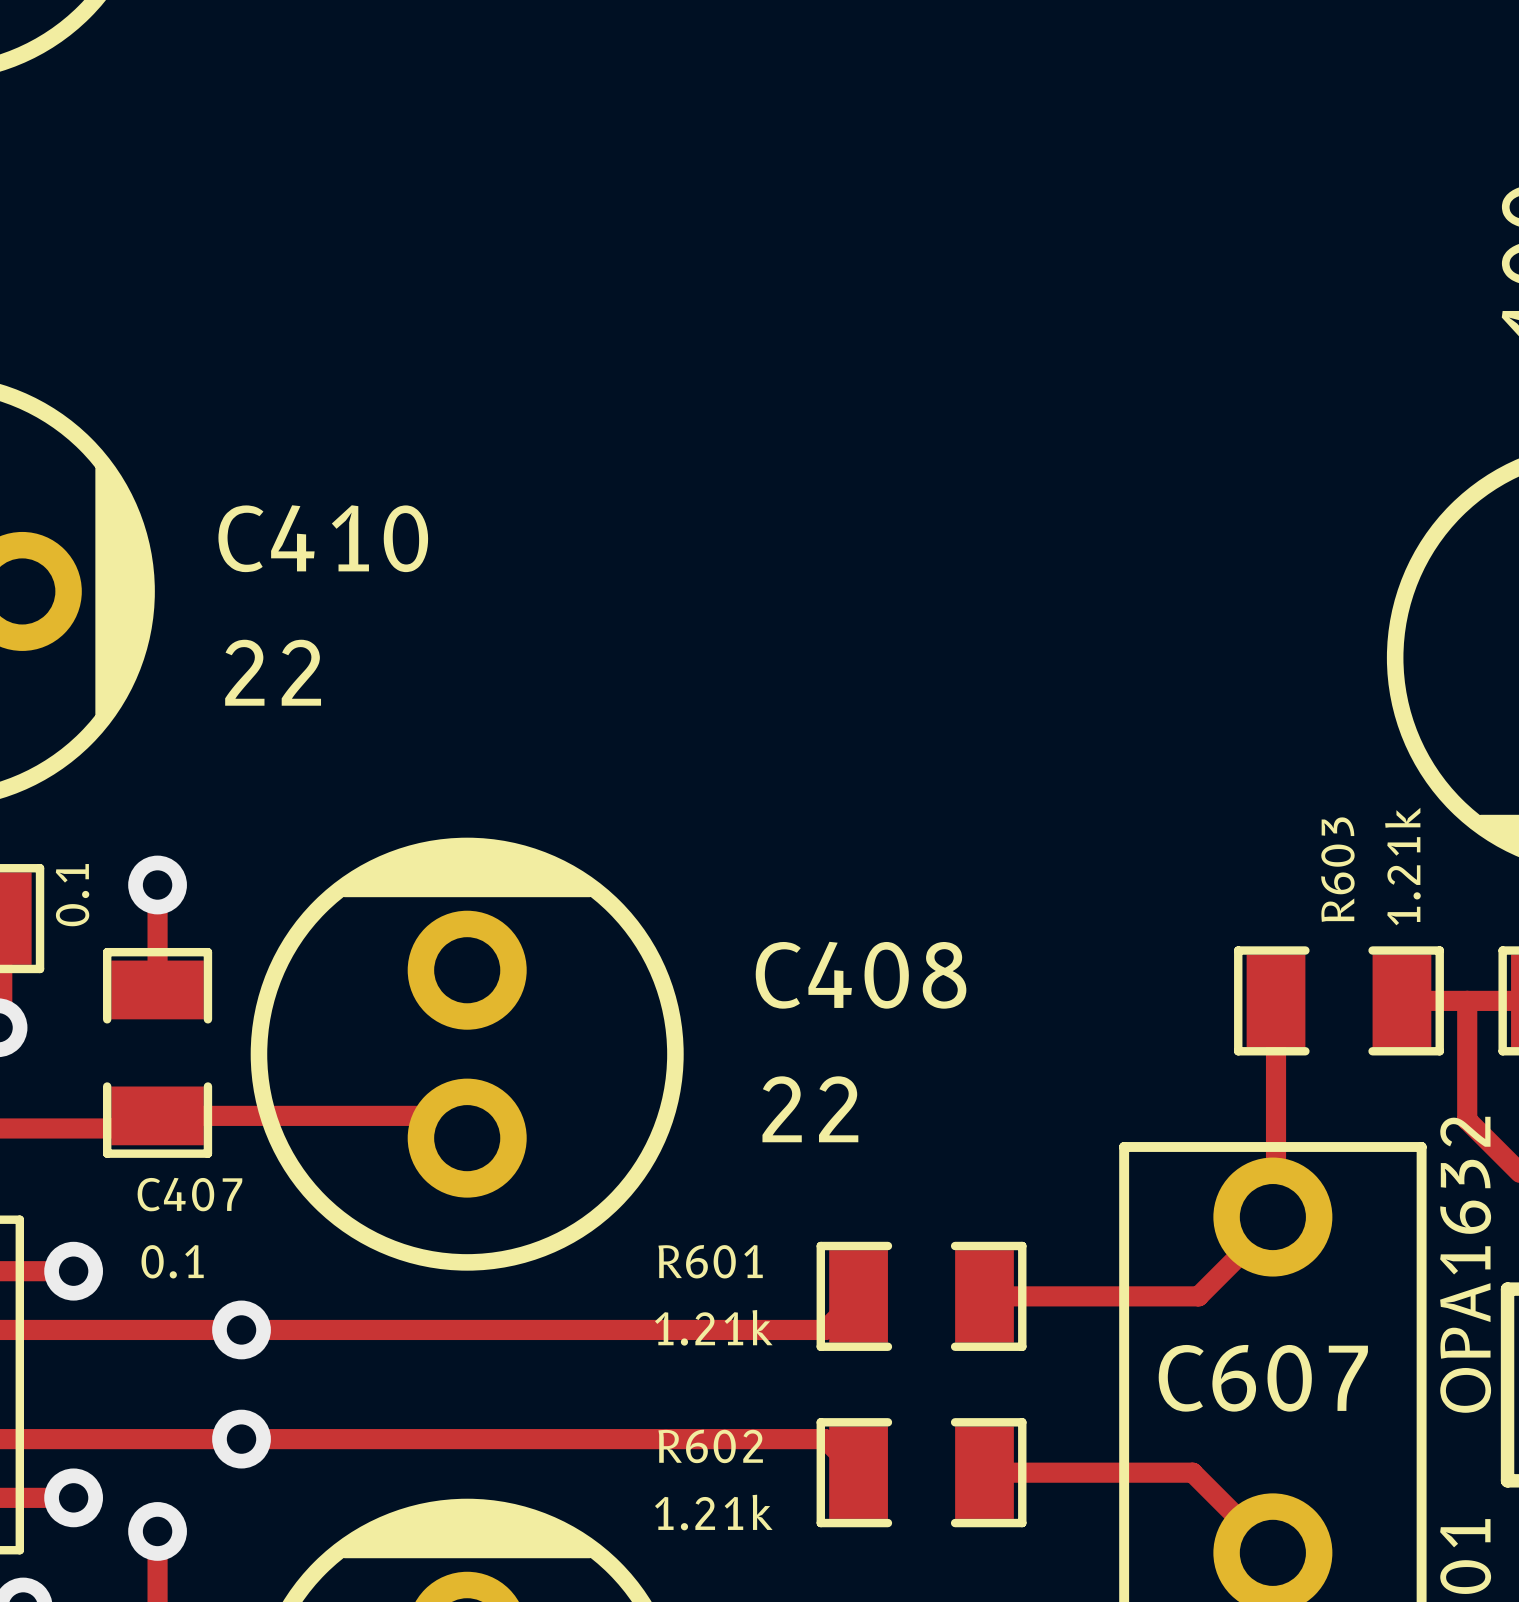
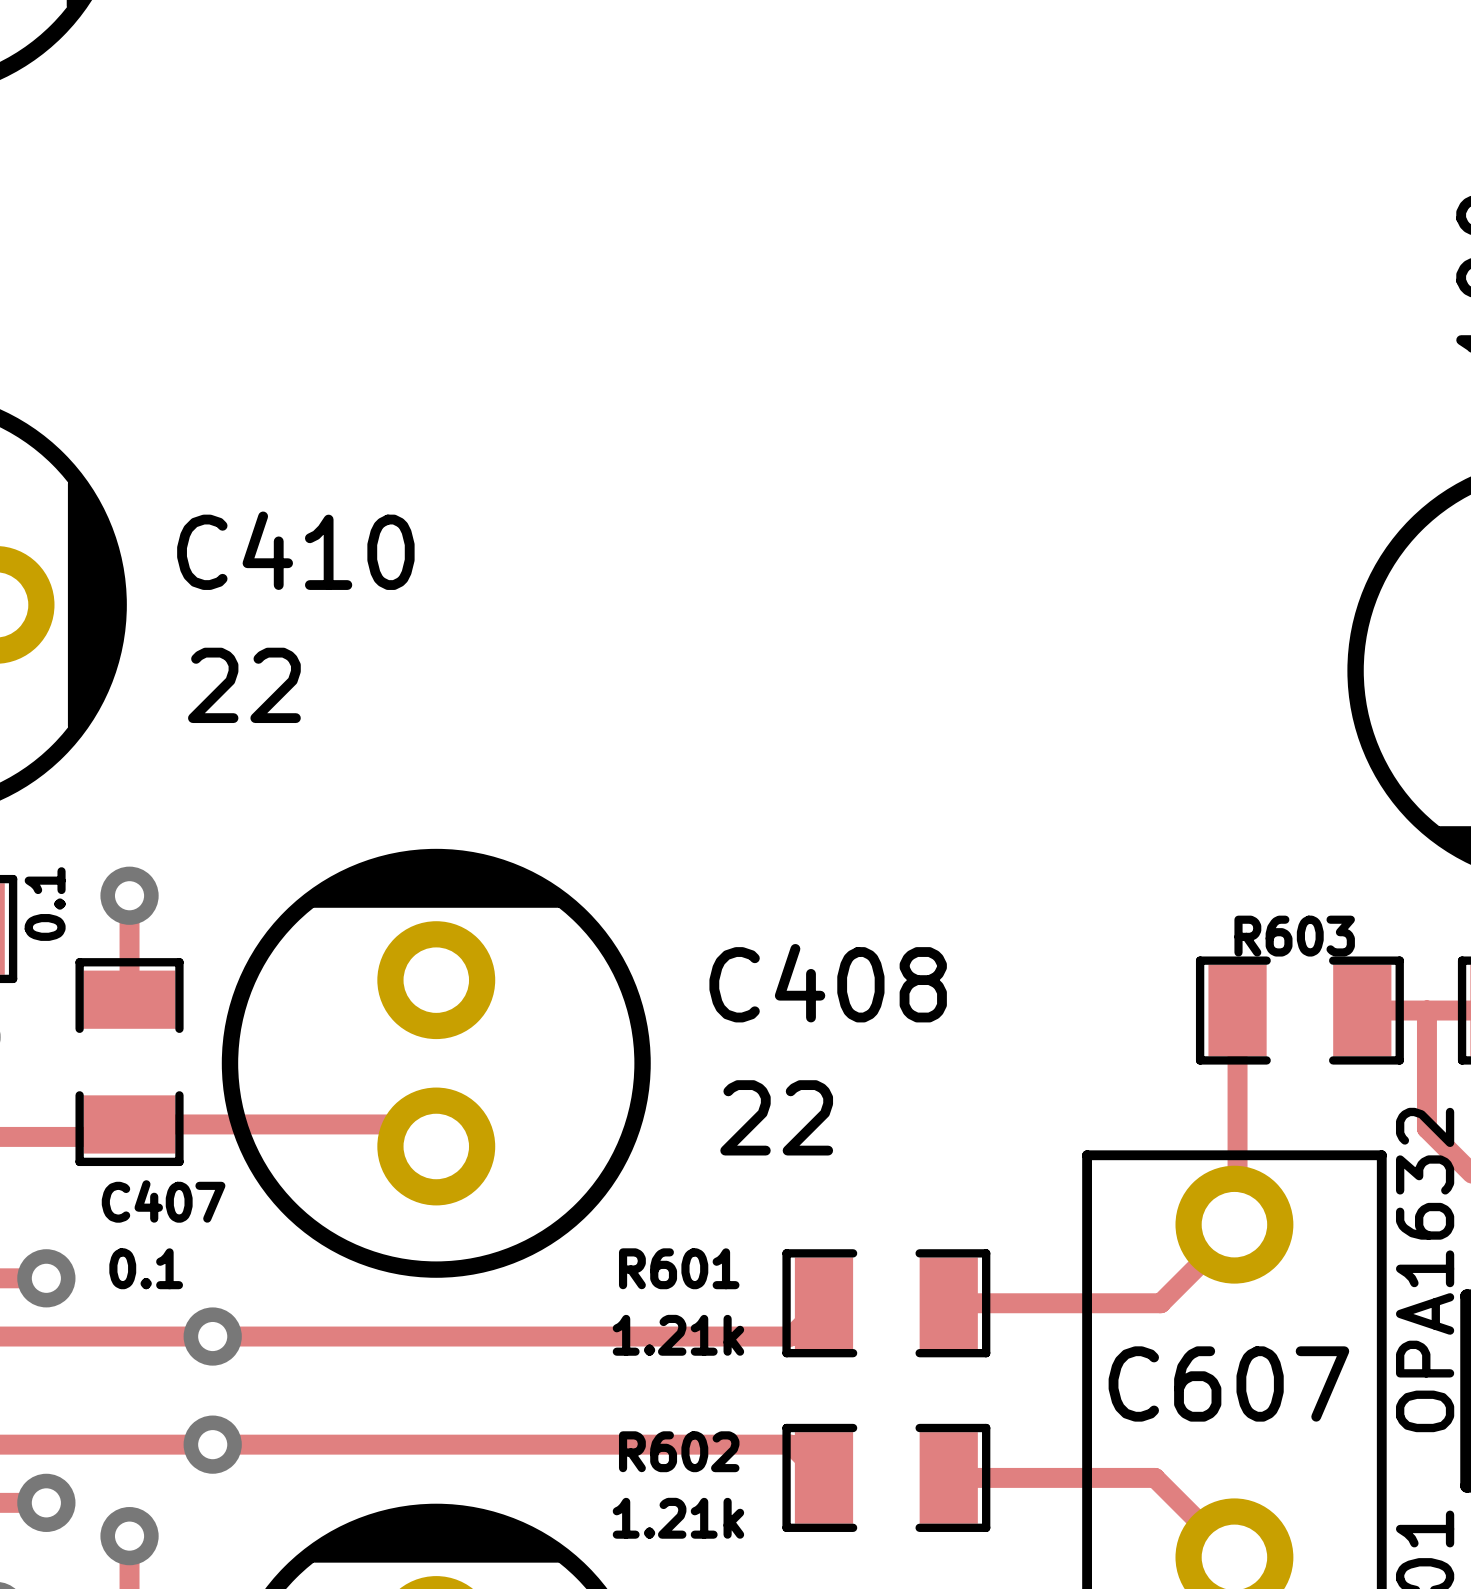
R603 value: 1.21k (1402, 866) -> none
R603 name rotation: 0° (1337, 869) -> 90° clockwise (1294, 936)

